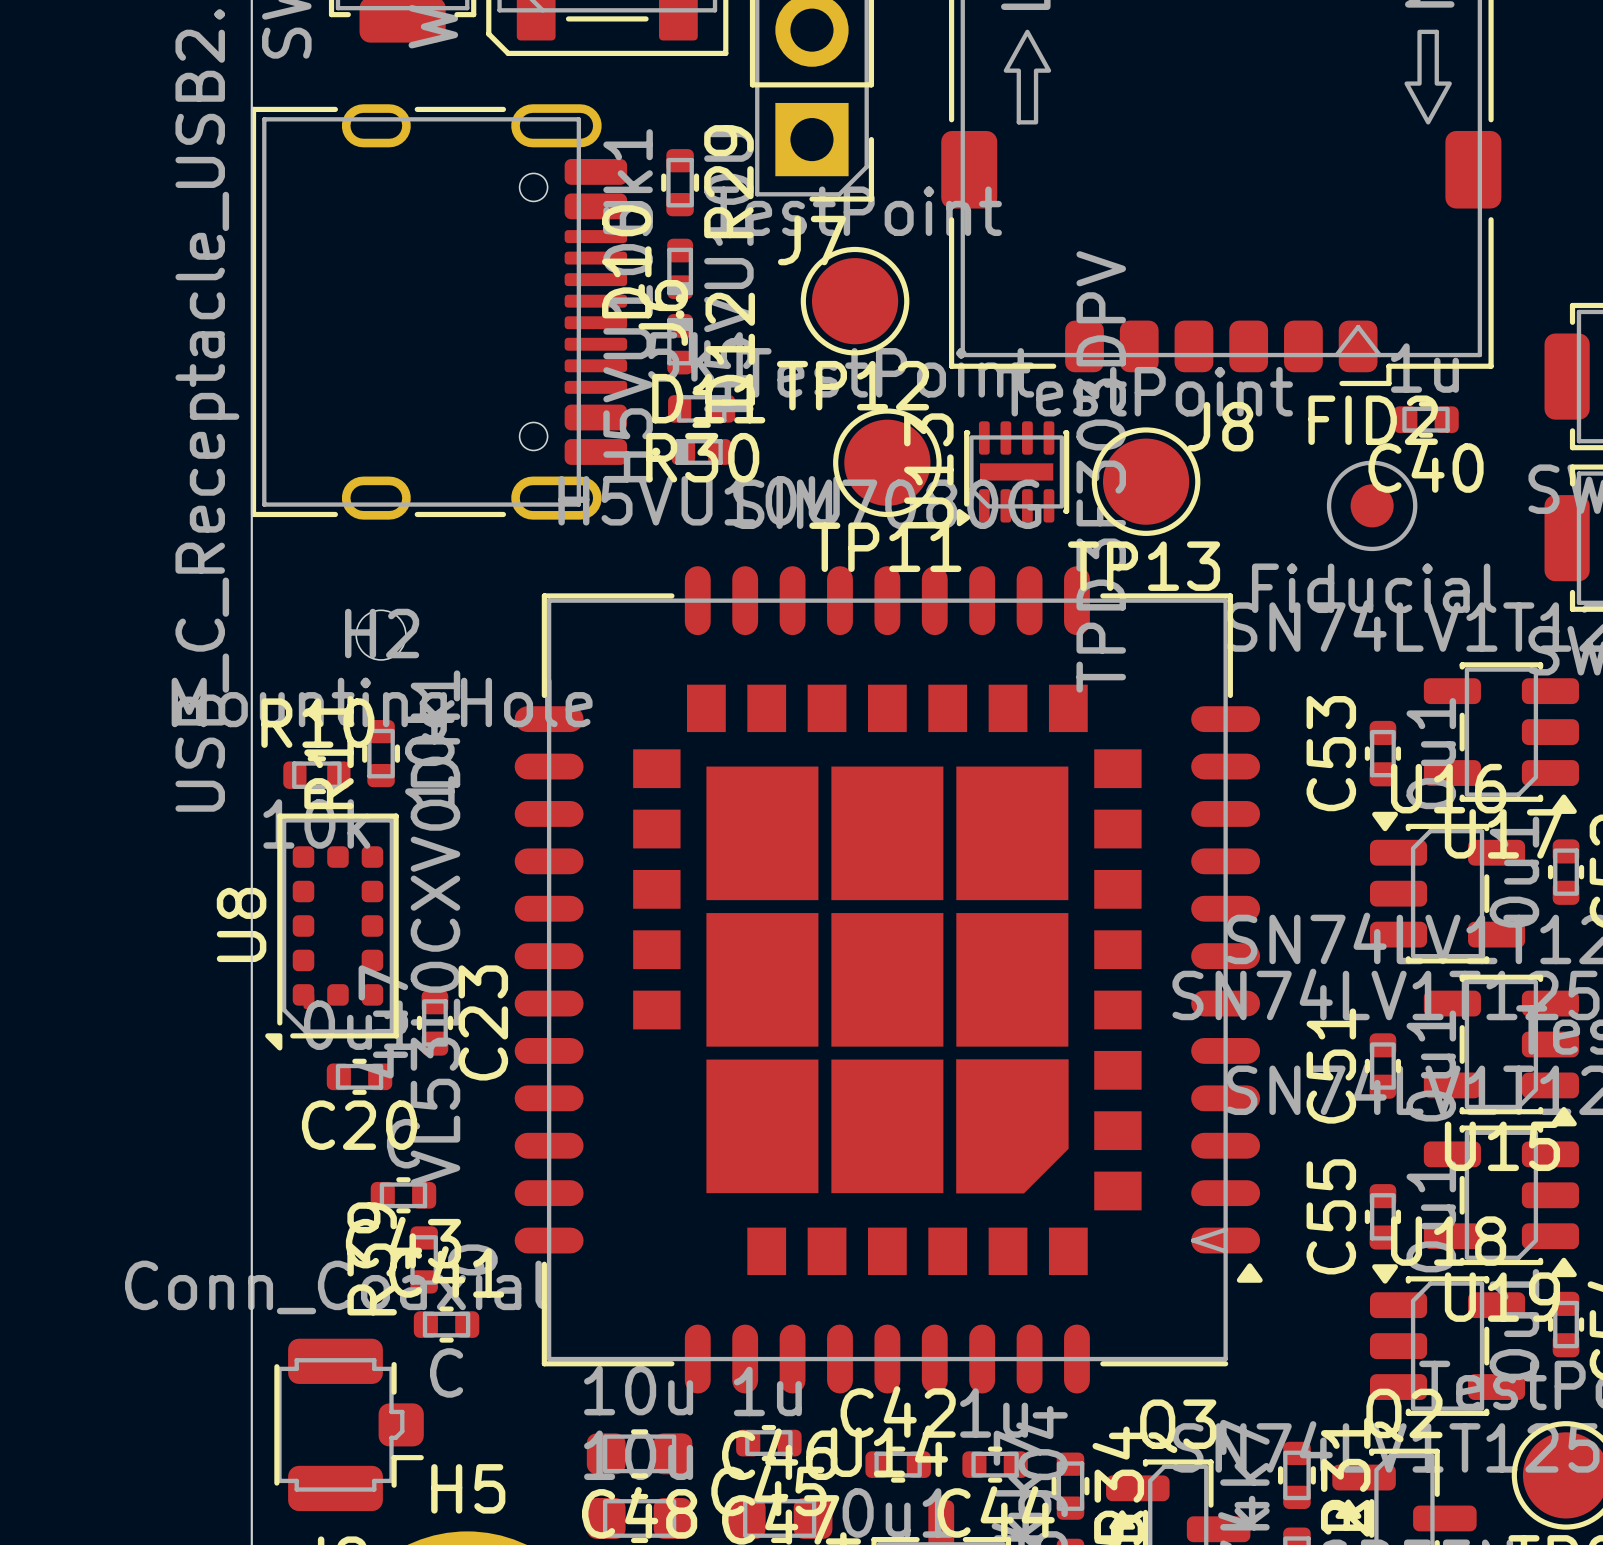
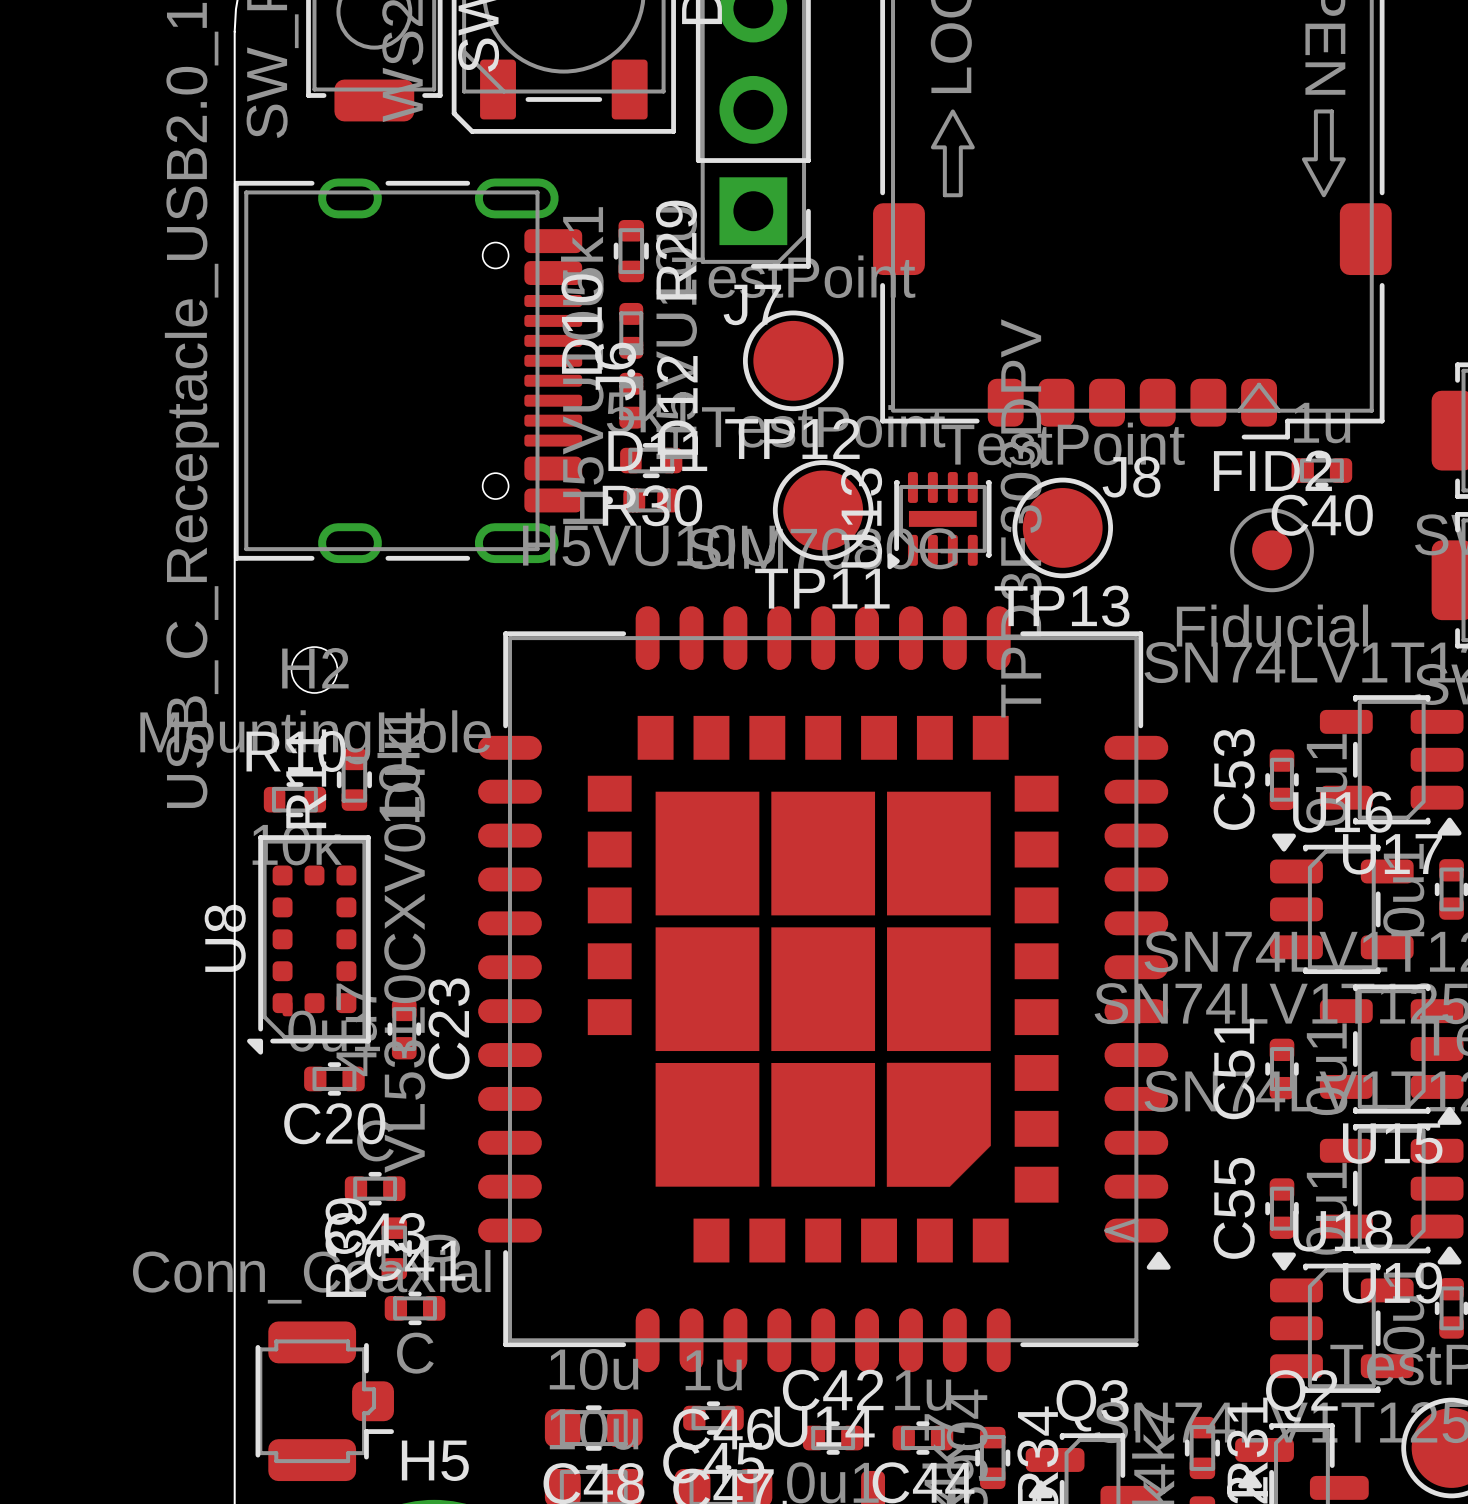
H2 position: (381, 635) -> (314, 670)

